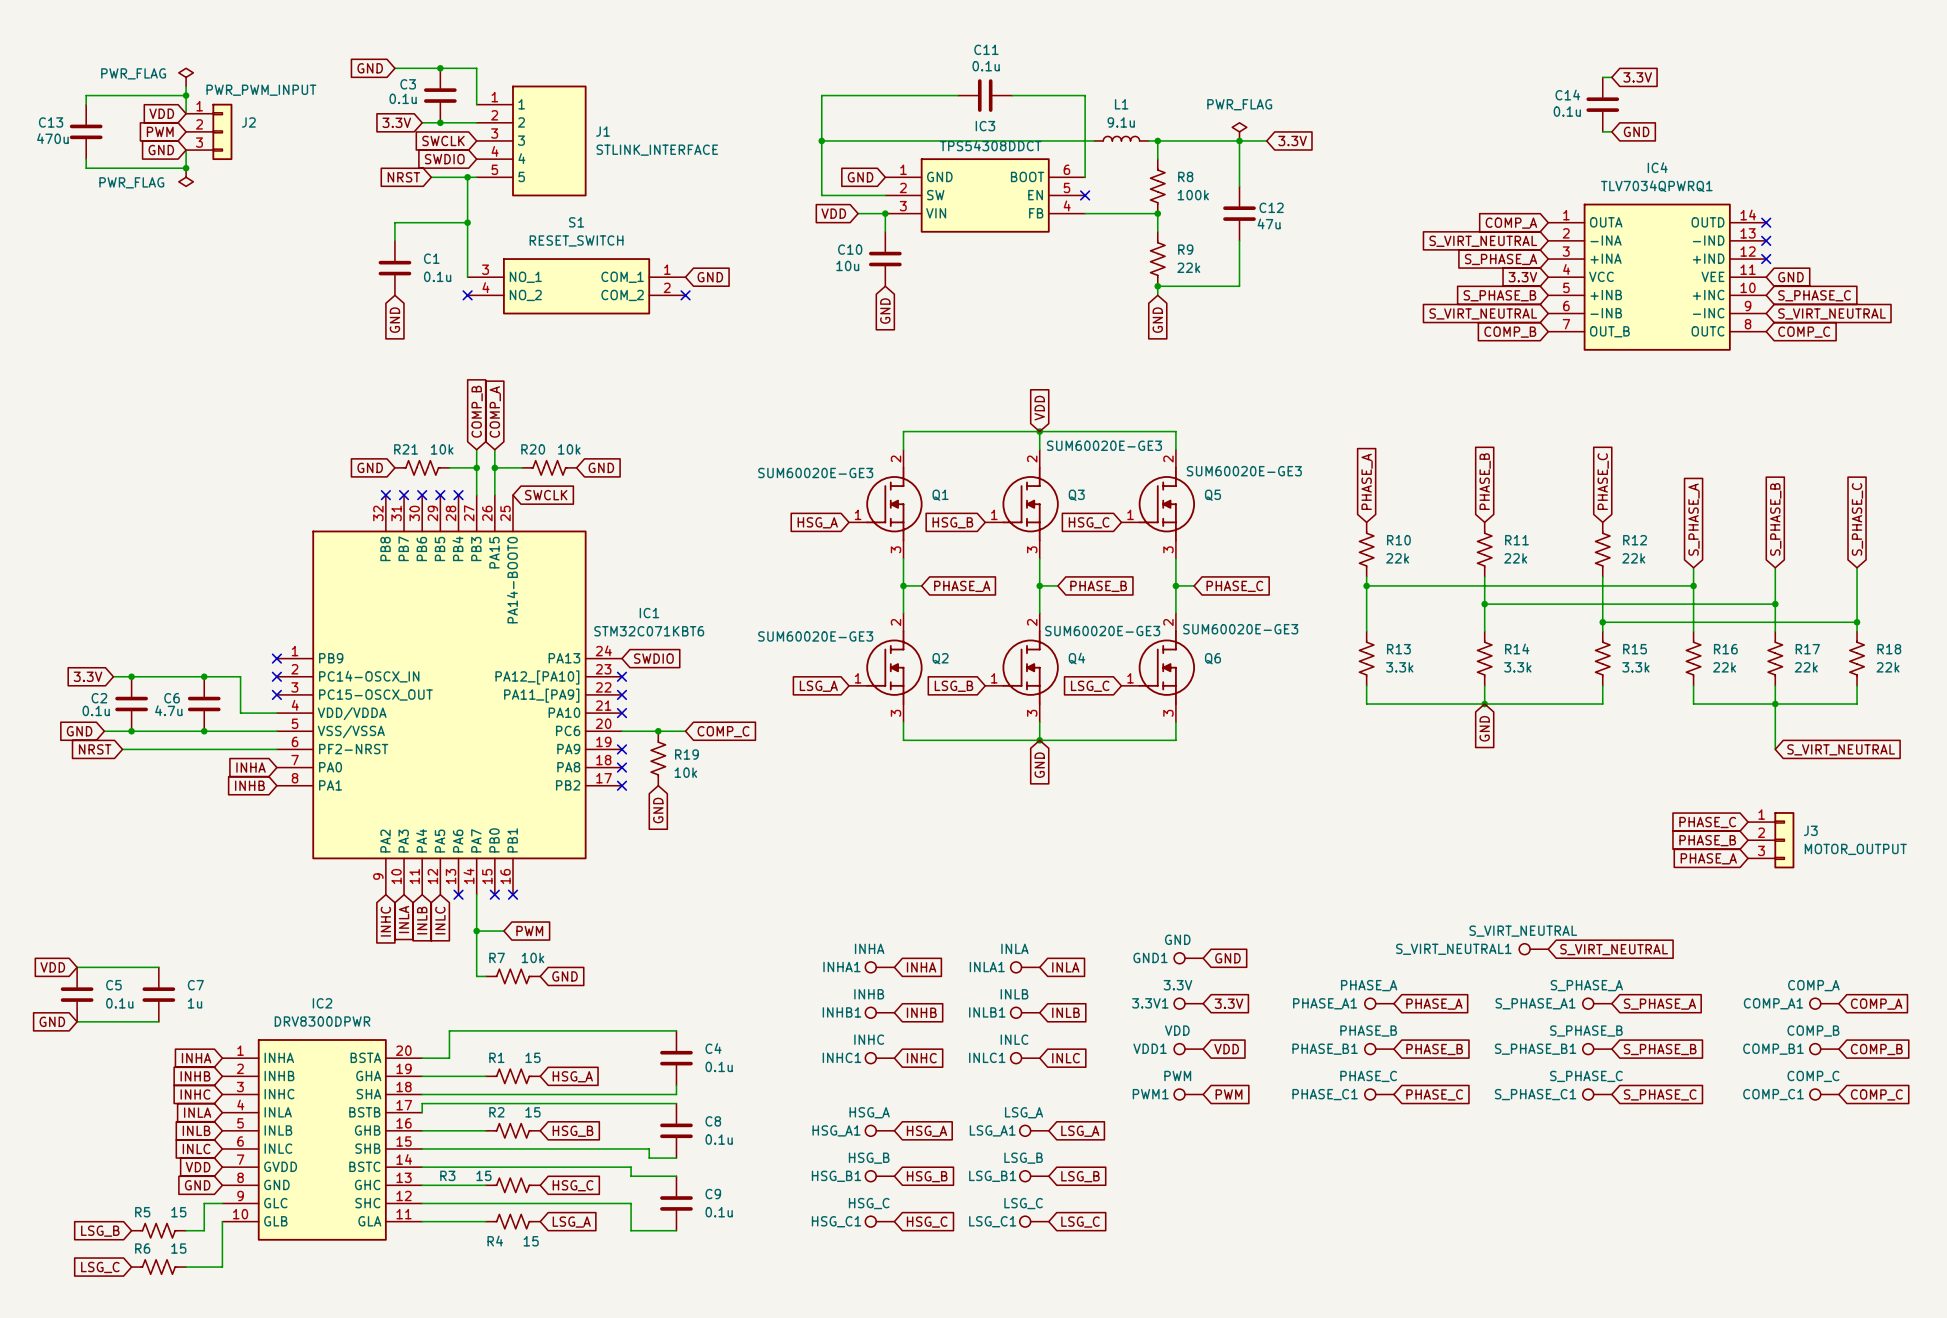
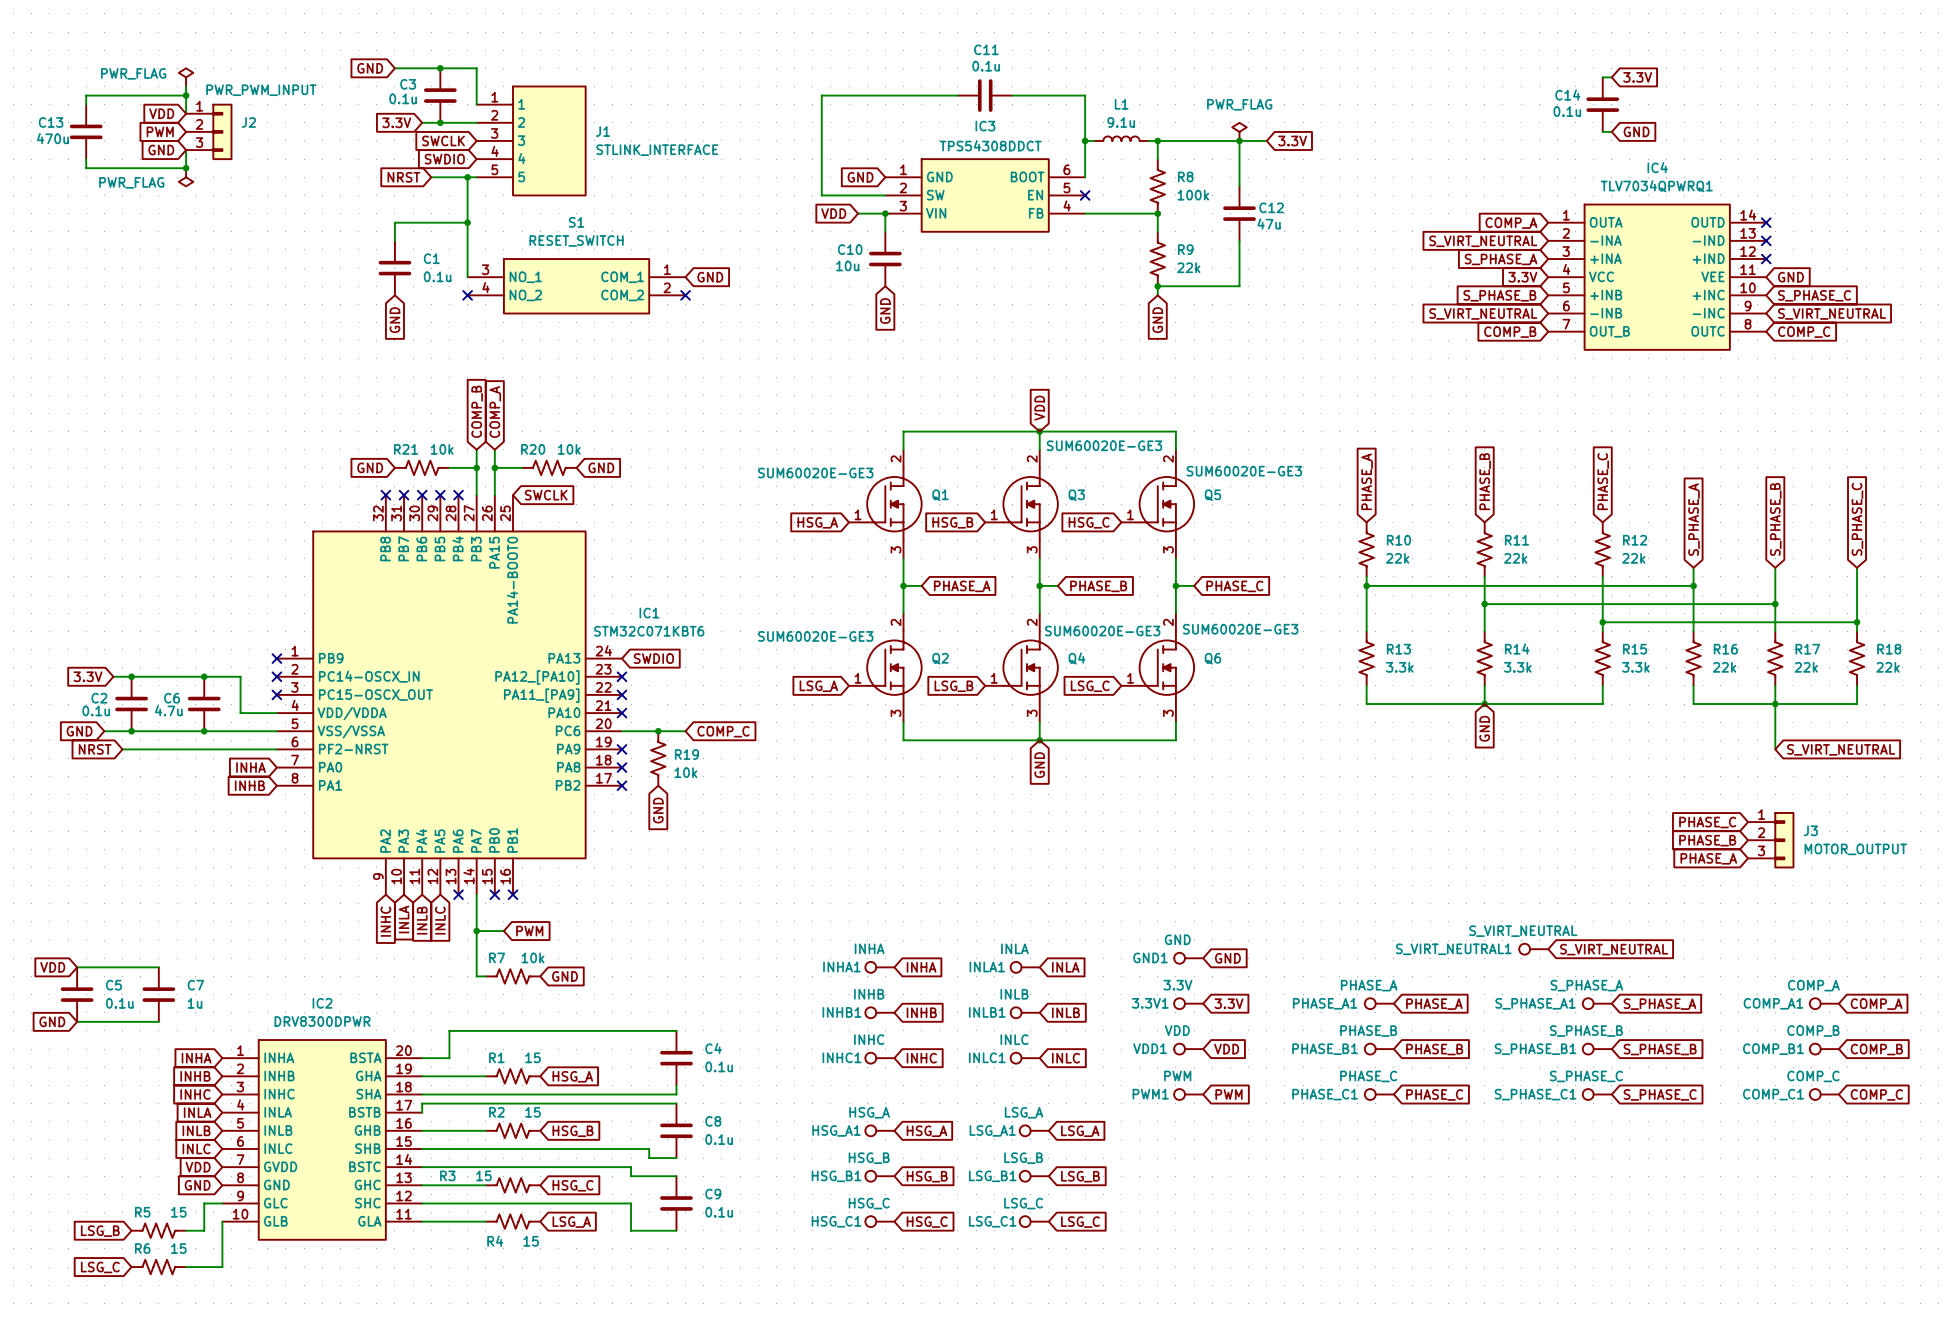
wire: (821, 140) (1085, 140) -> none
junction: (821, 140) -> none
junction: none -> (1085, 140)

